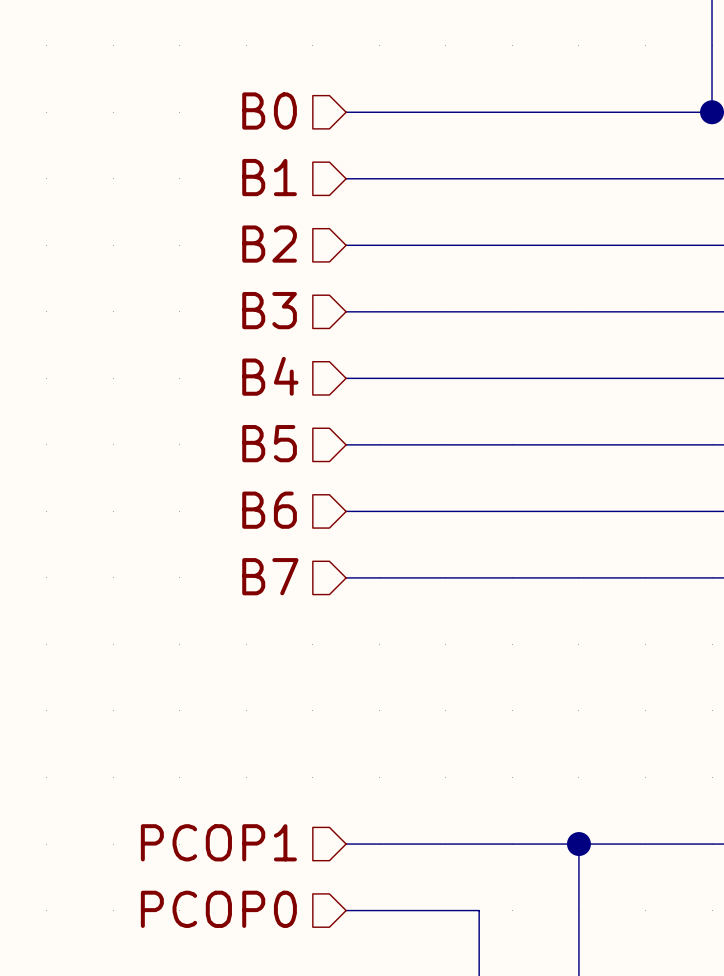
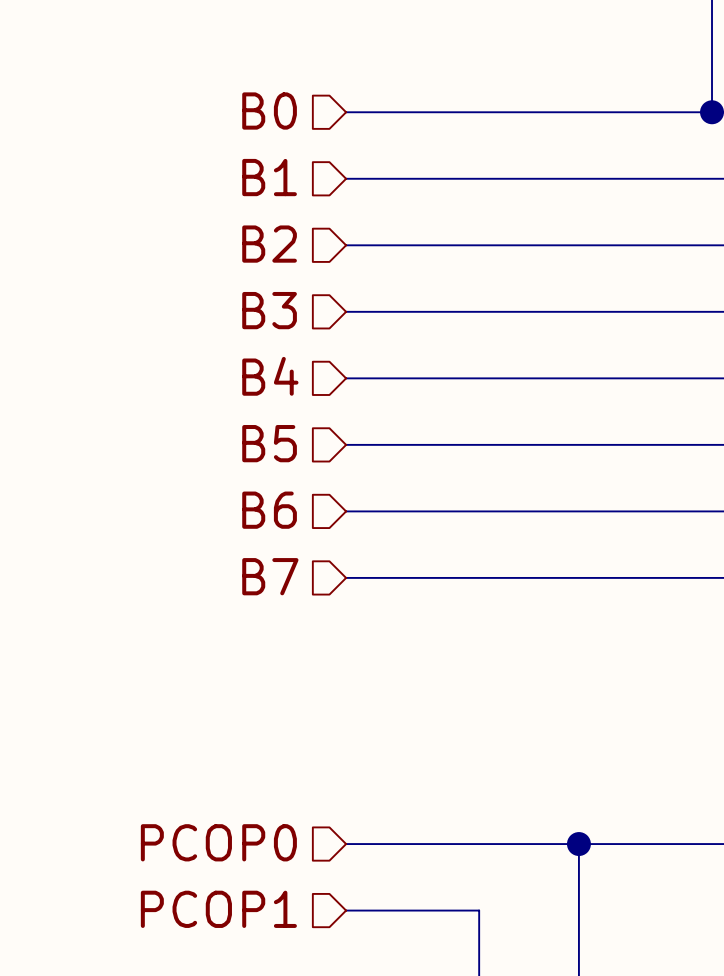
hierarchical label: PCOP1 (218, 842) -> PCOP0 (218, 842)
hierarchical label: PCOP0 (218, 909) -> PCOP1 (218, 909)

